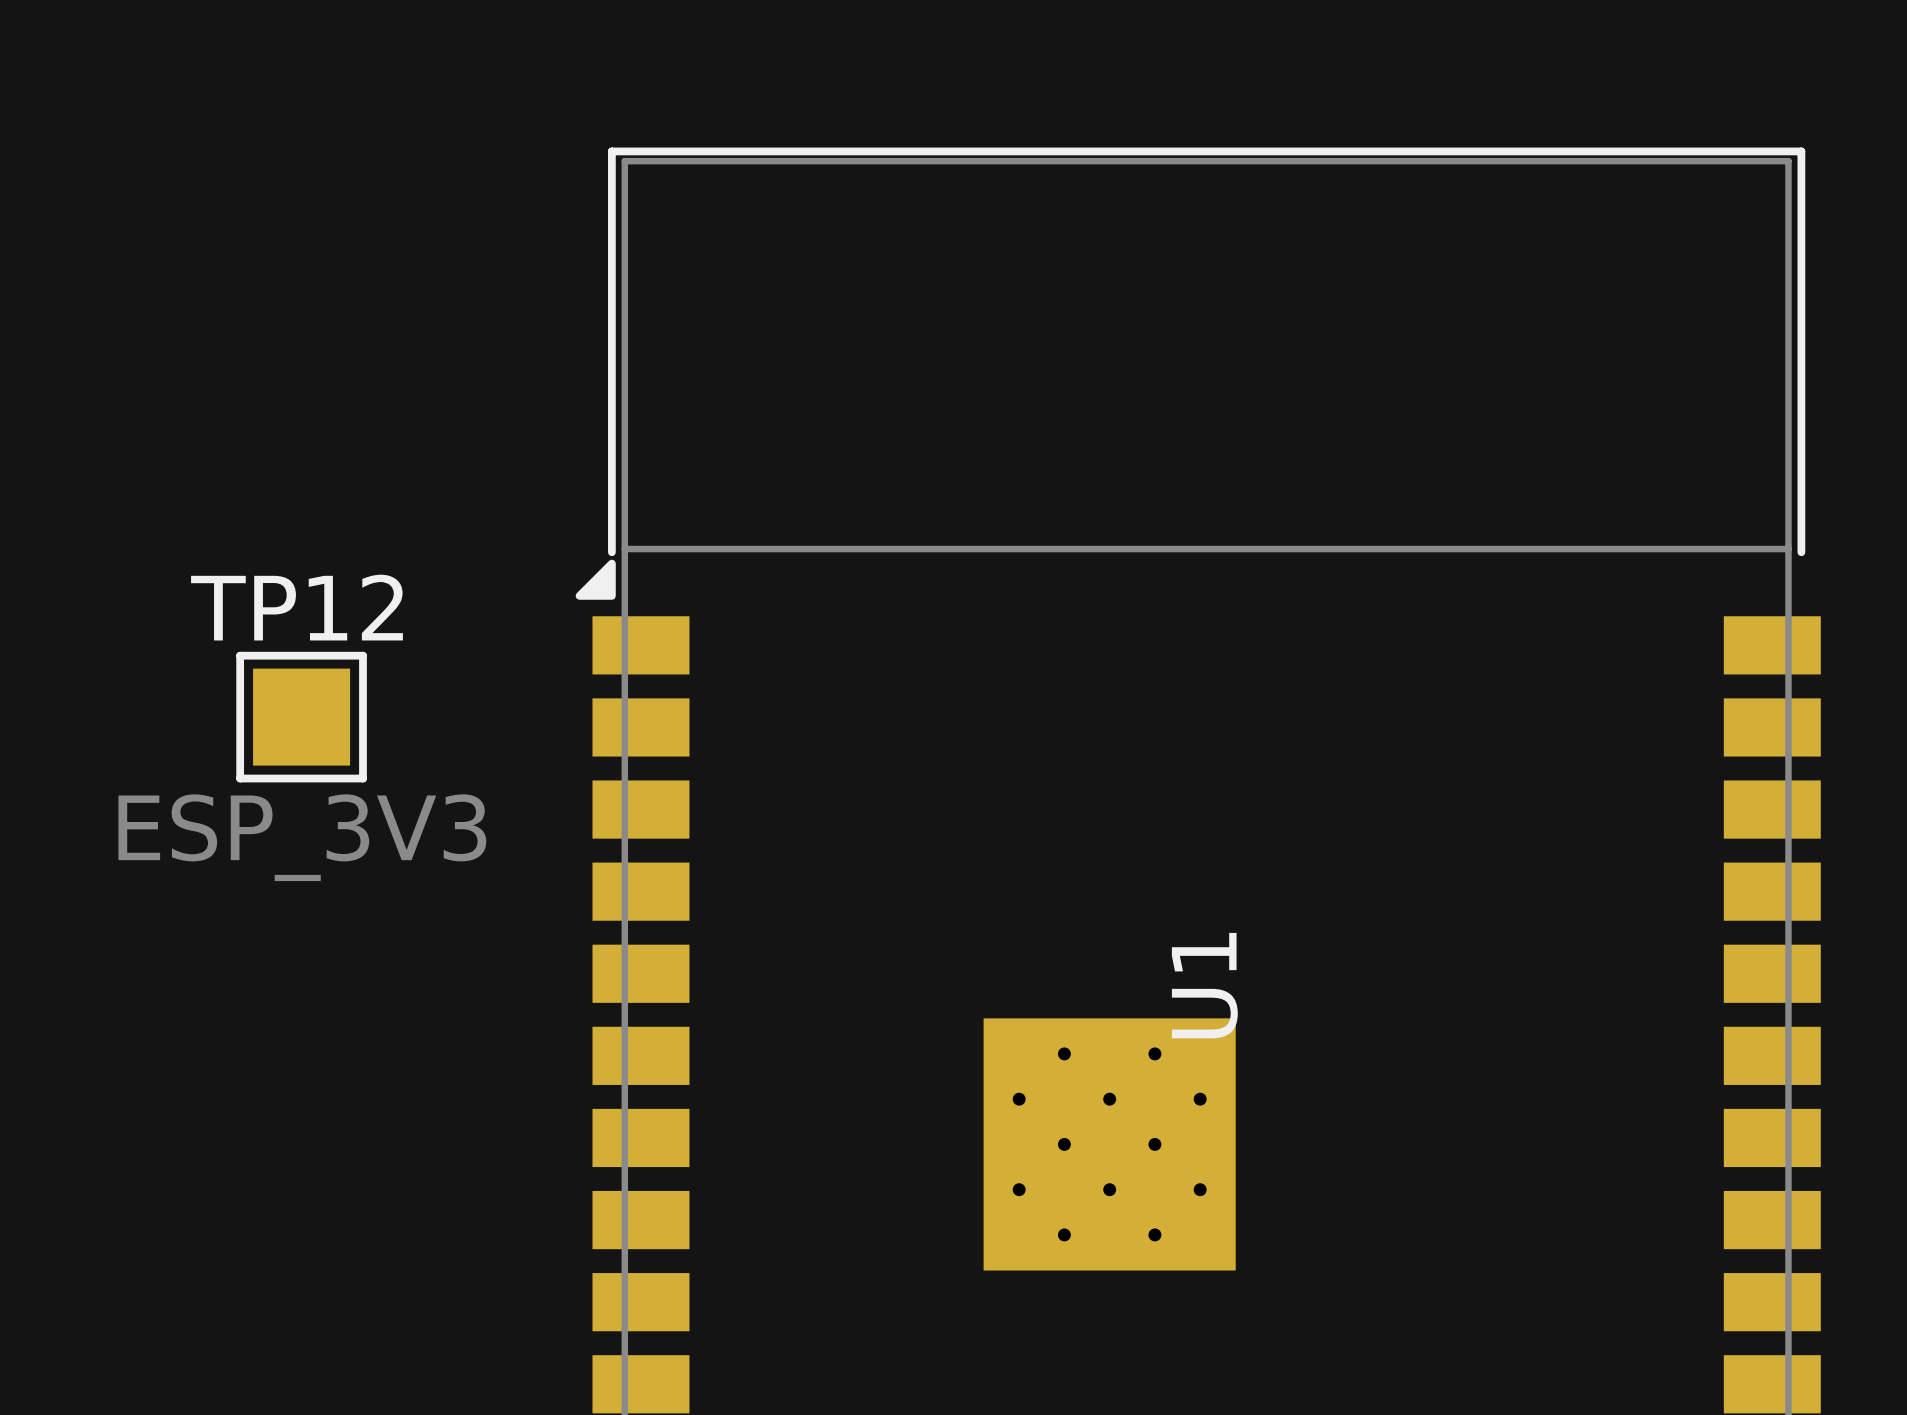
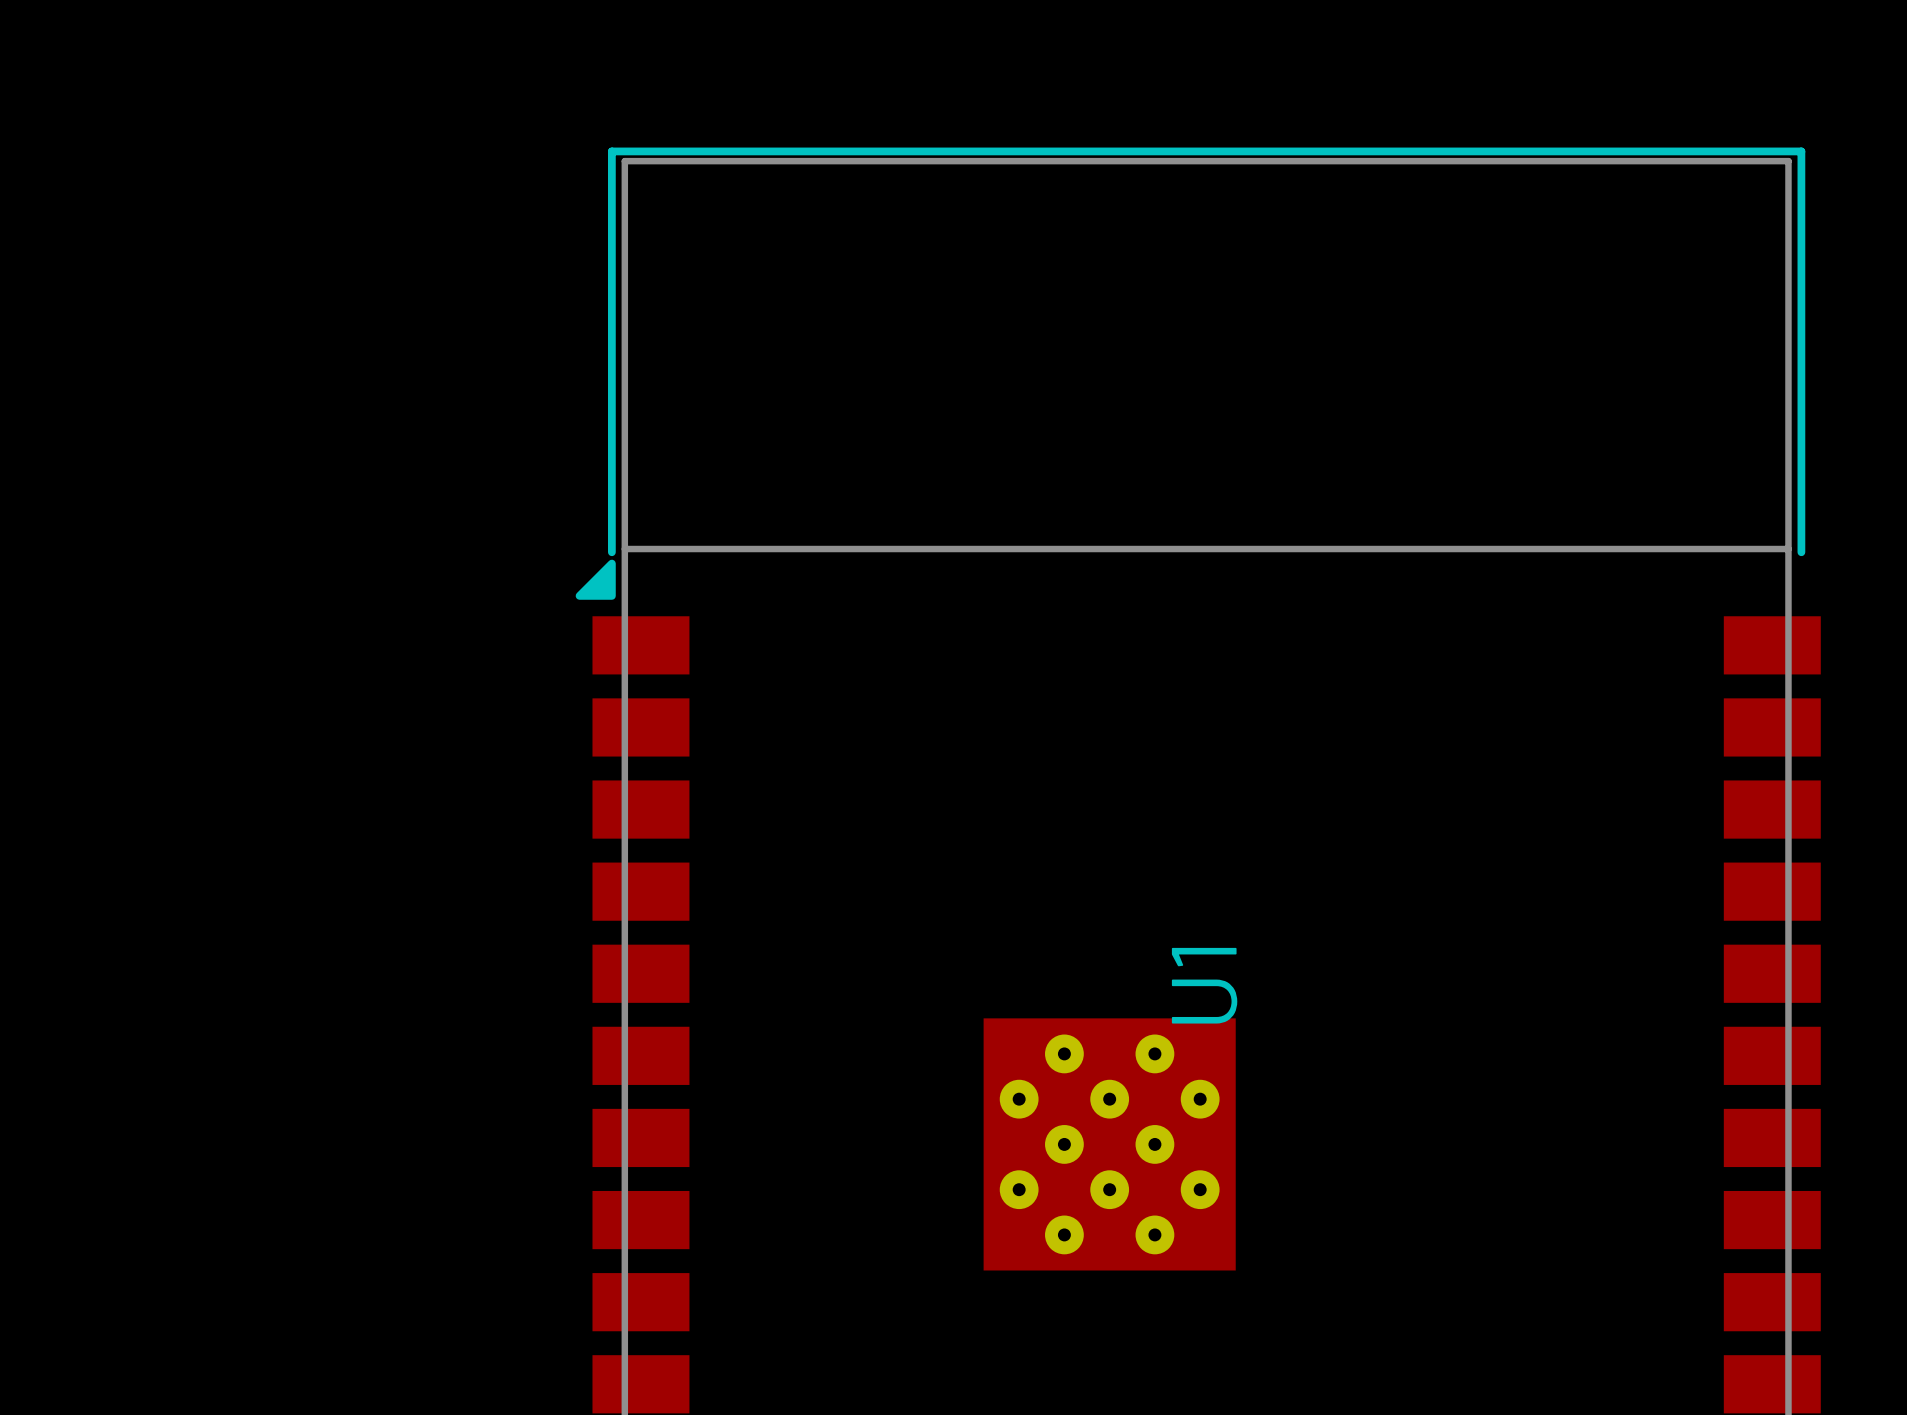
TP12: ESP_3V3 (301, 717) -> none

